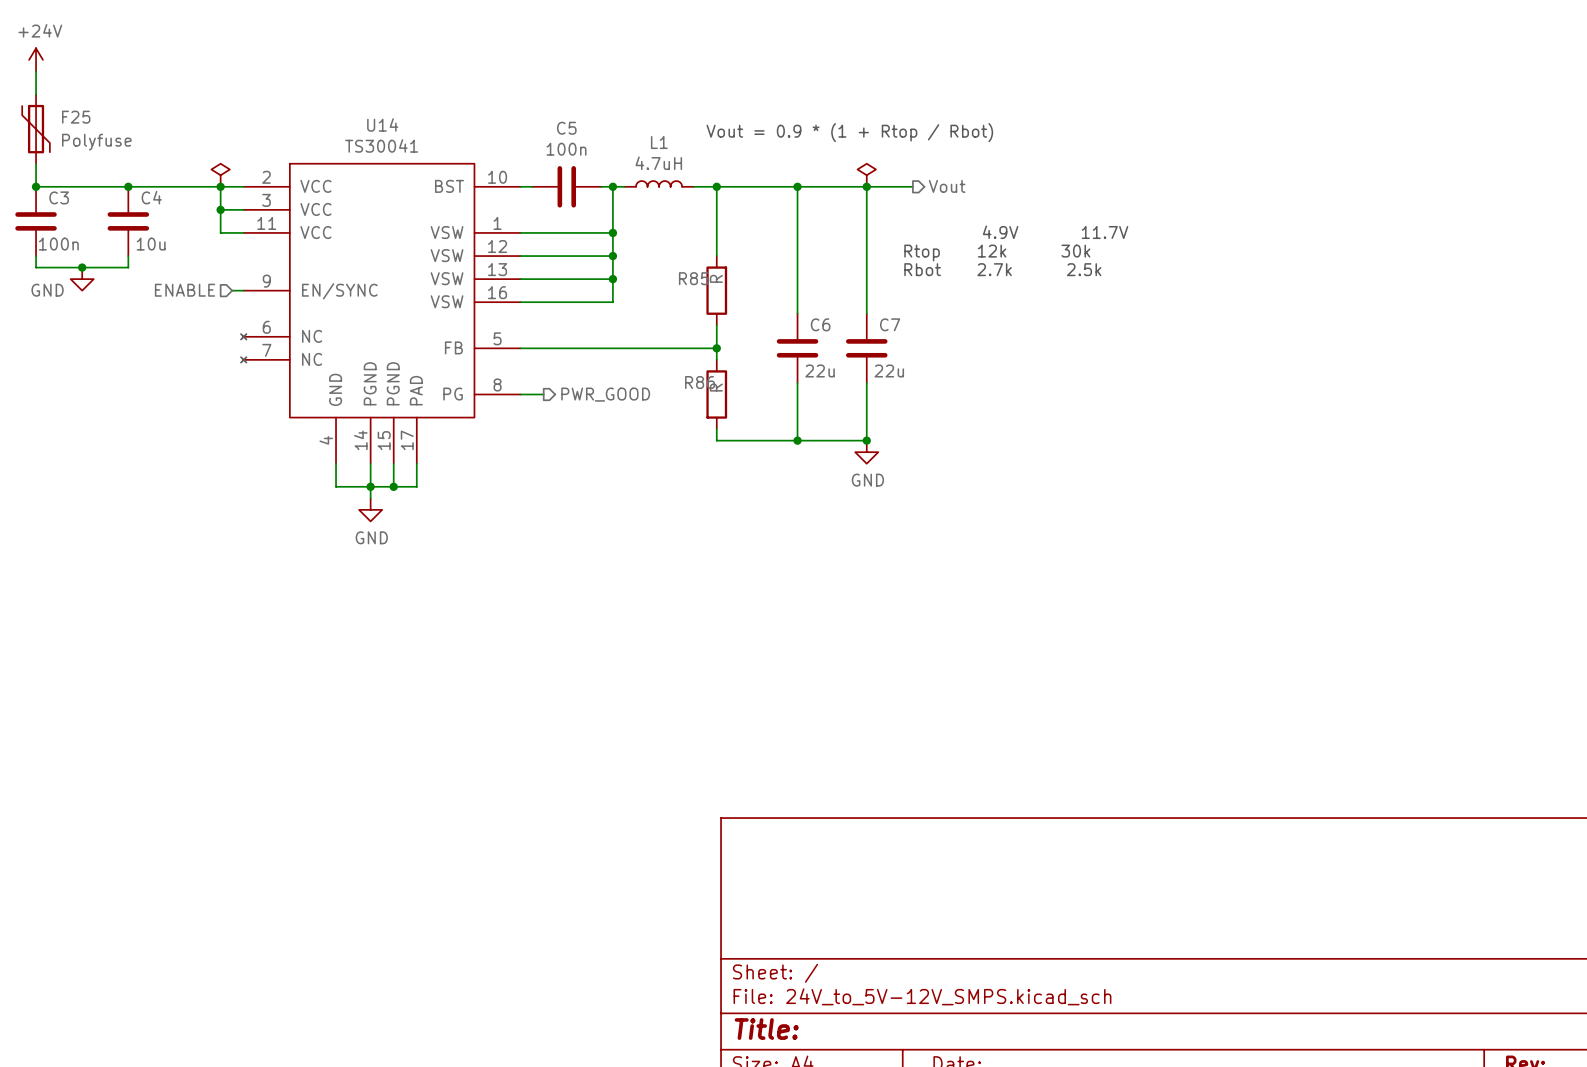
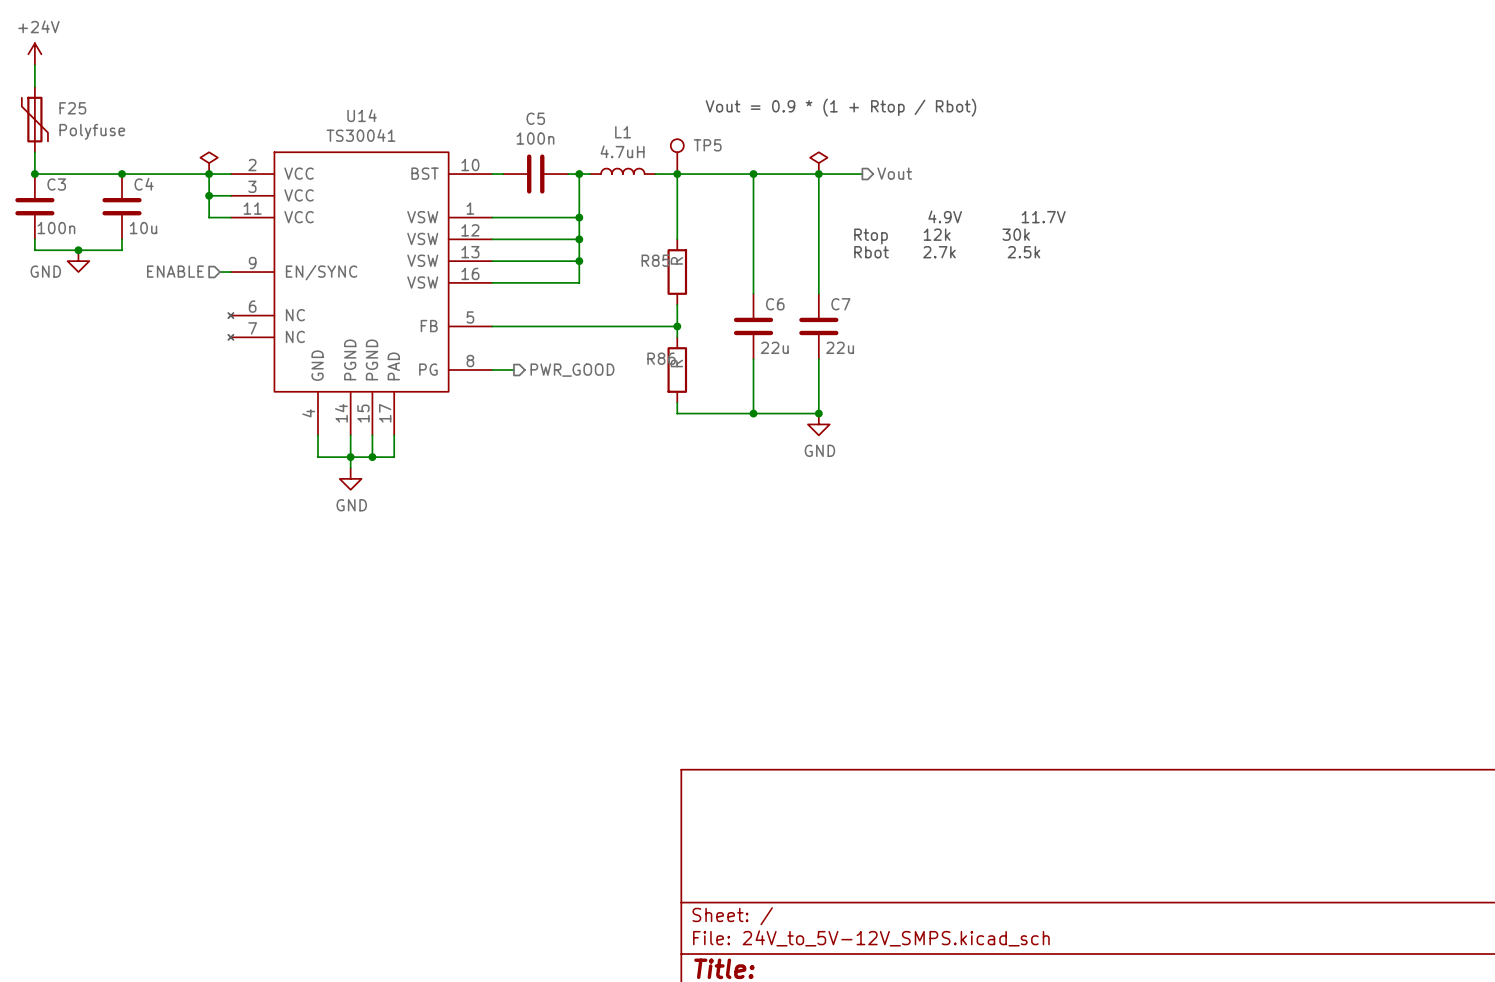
text position: Vout = 0.9 * (1 + Rtop / Rbot) (849, 132) -> Vout = 0.9 * (1 + Rtop / Rbot) (840, 107)
TP5: none -> (677, 156)

